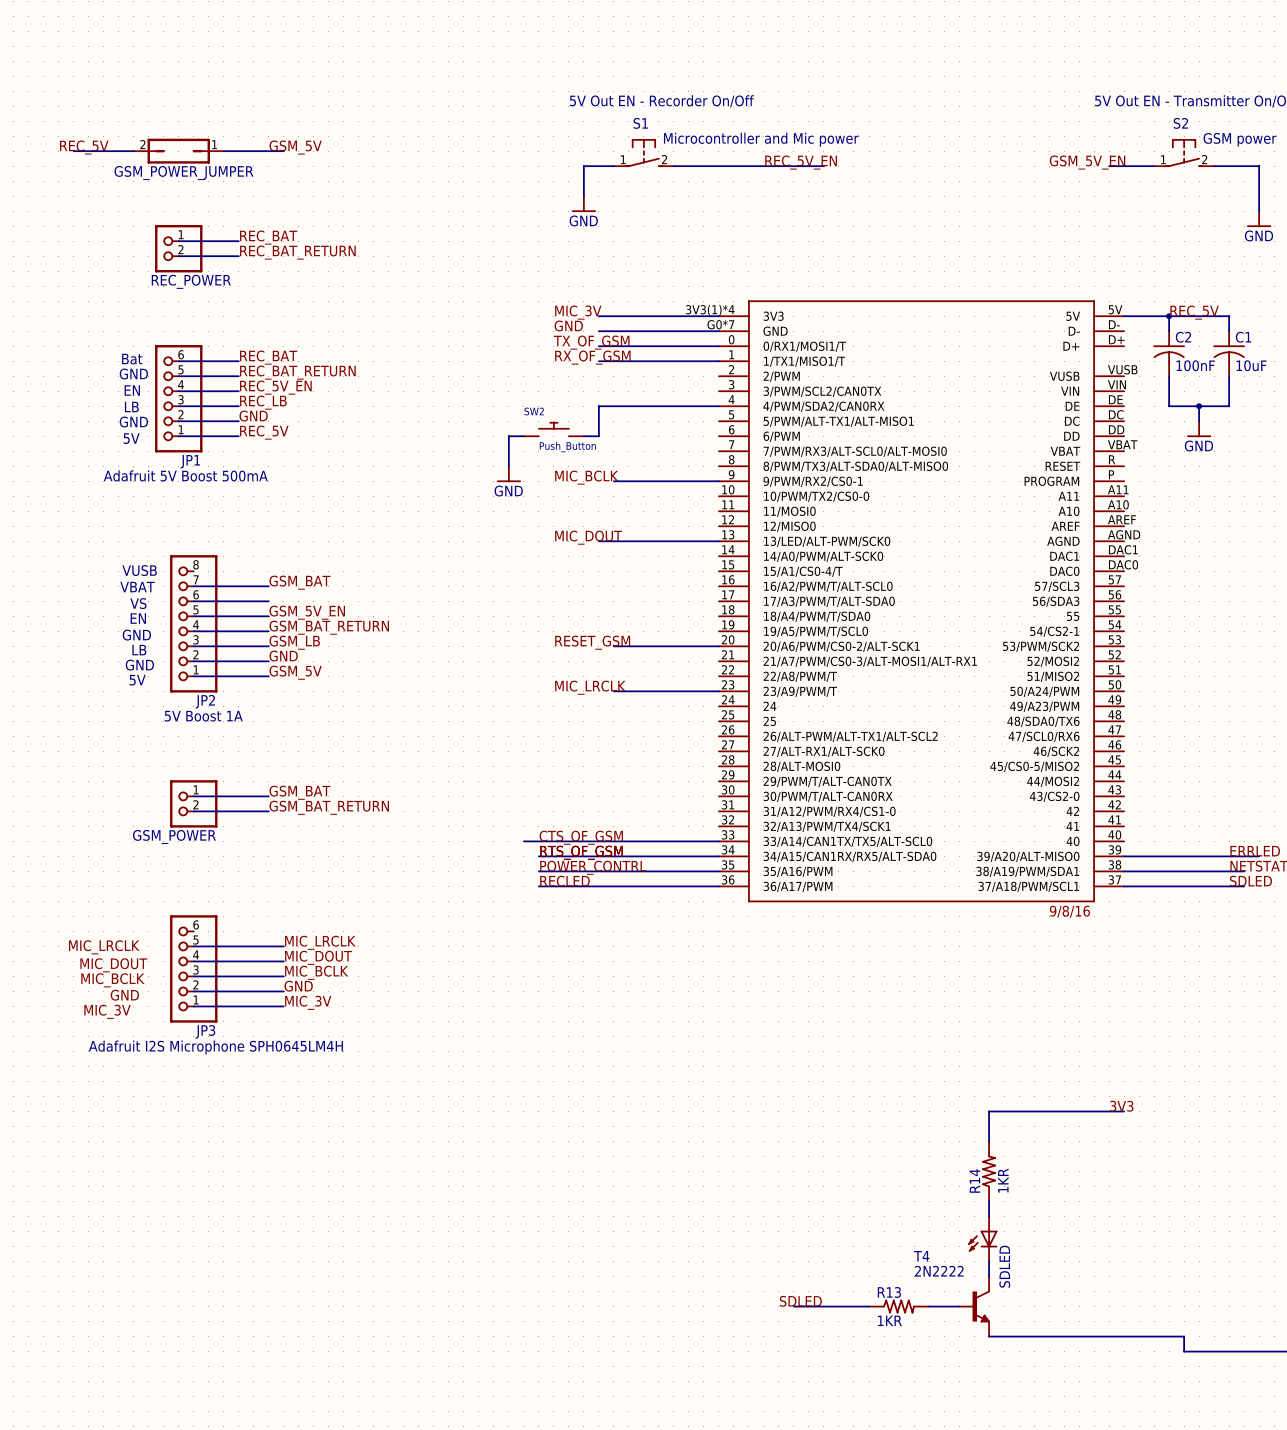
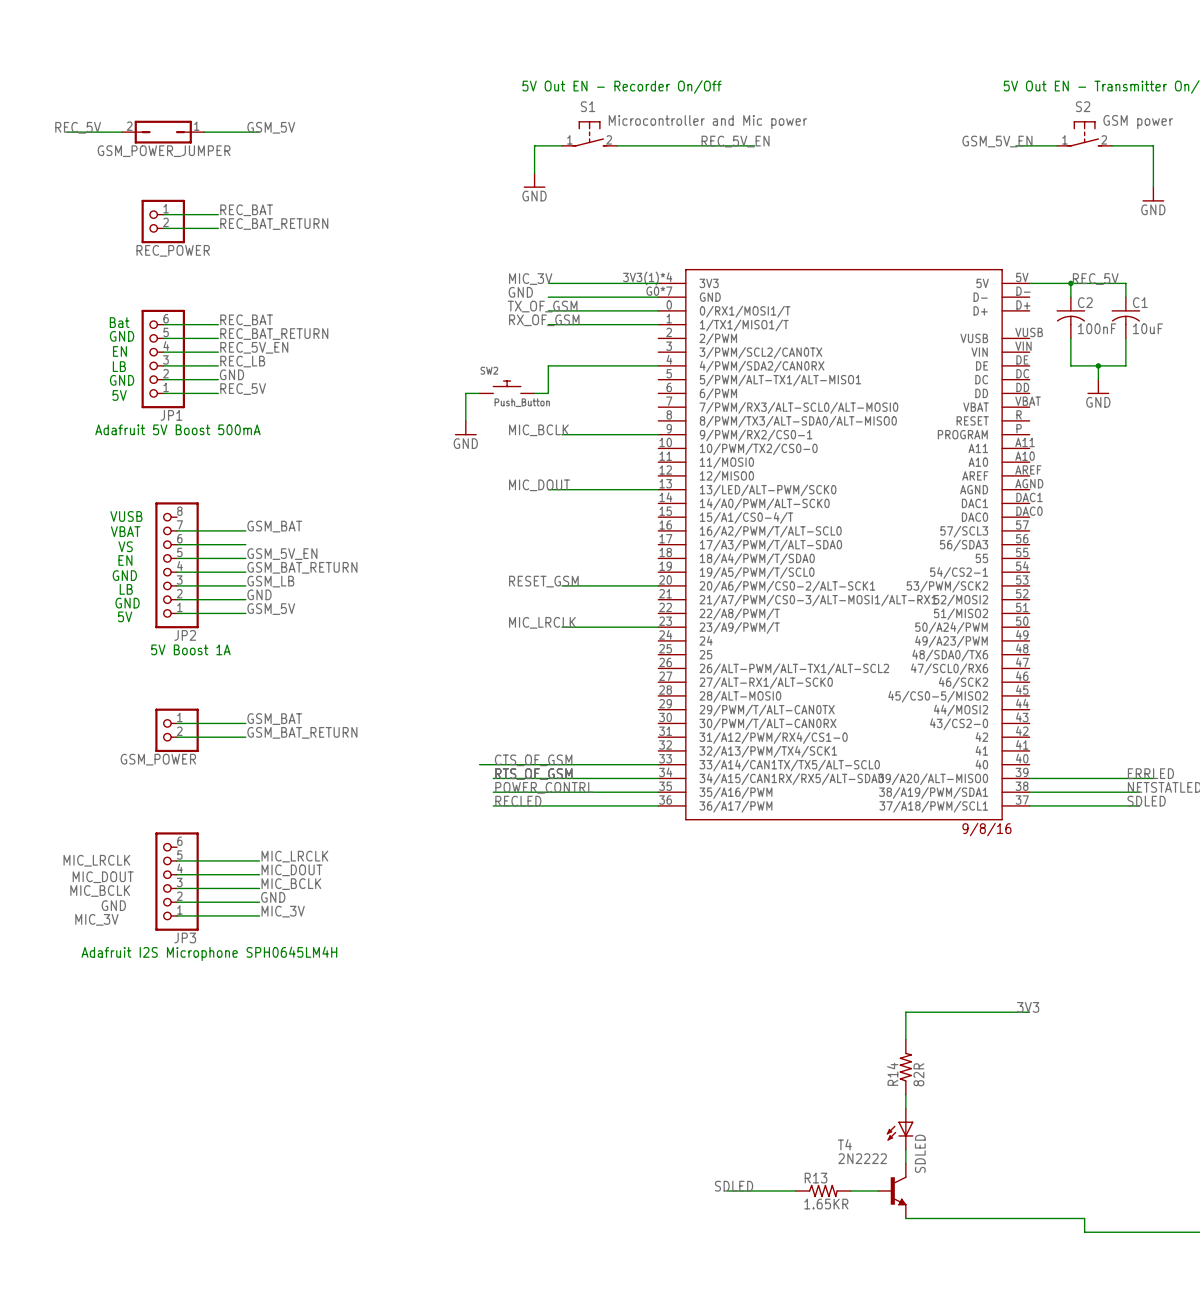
R14 value: 1KR (1003, 1180) -> 82R (918, 1074)
R13 value: 1KR (889, 1320) -> 1.65KR (826, 1204)

